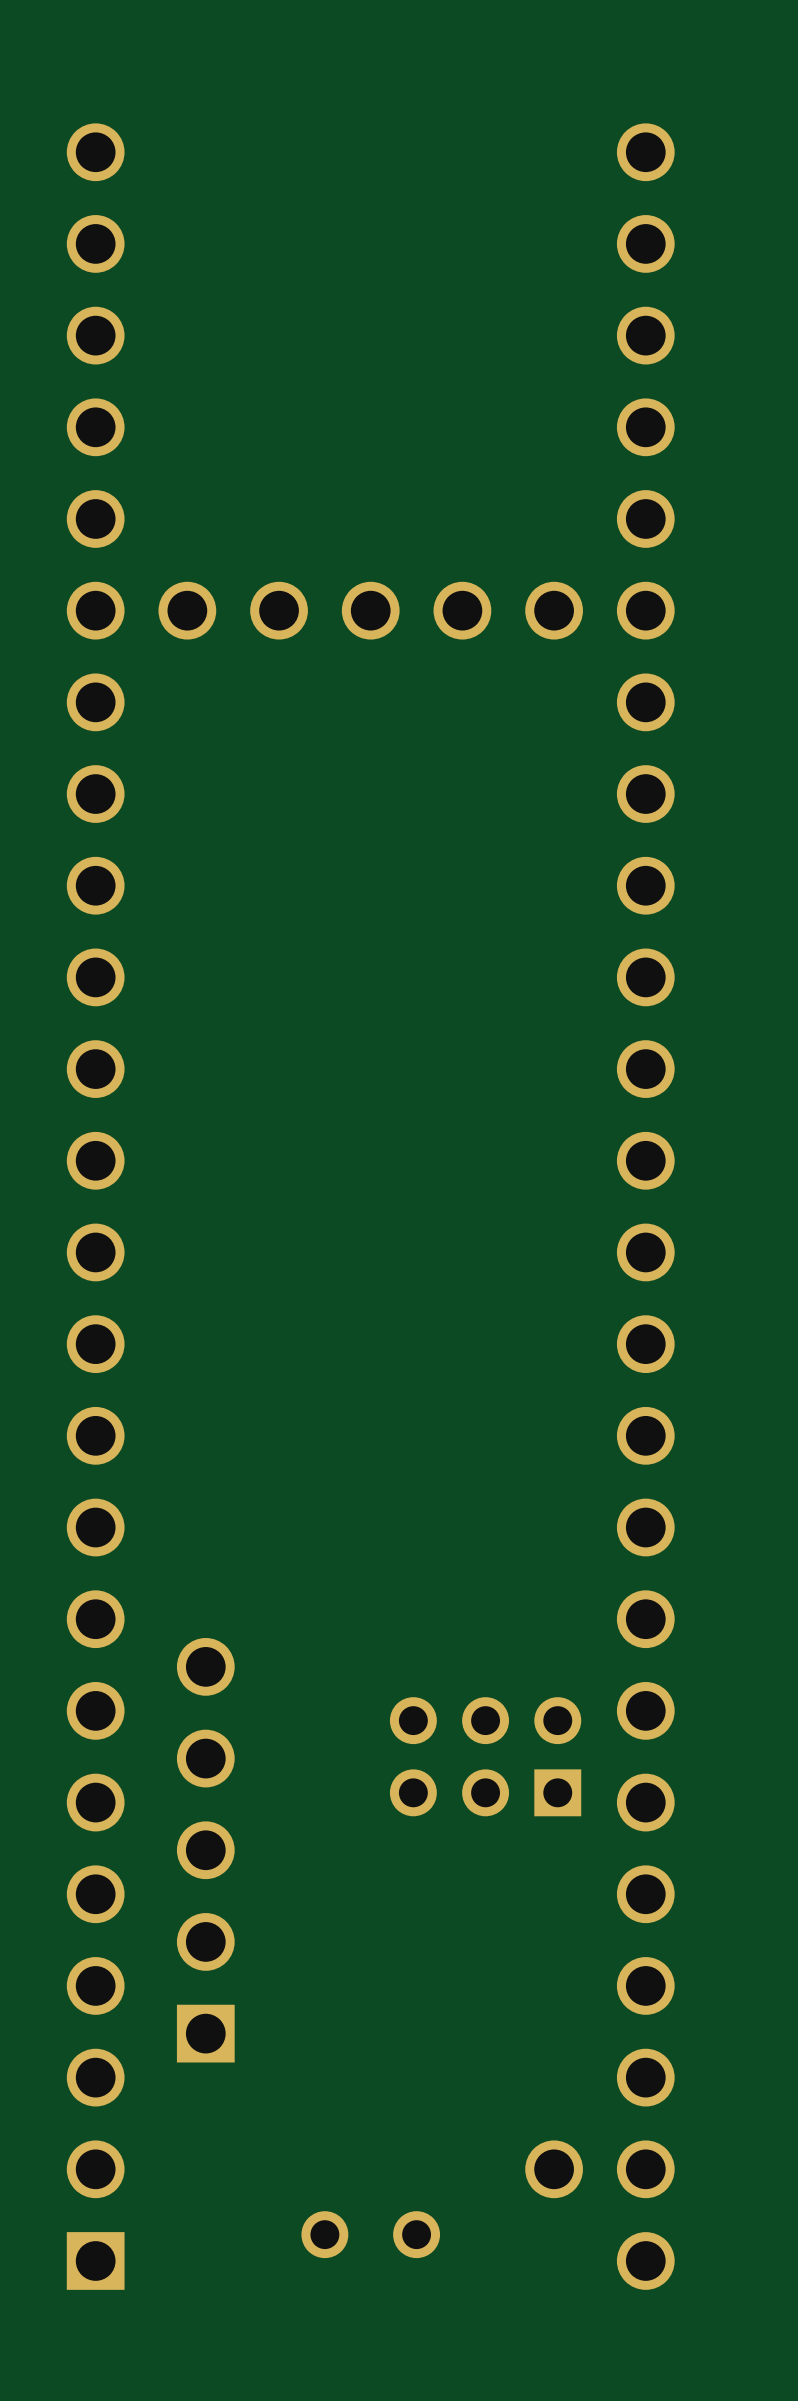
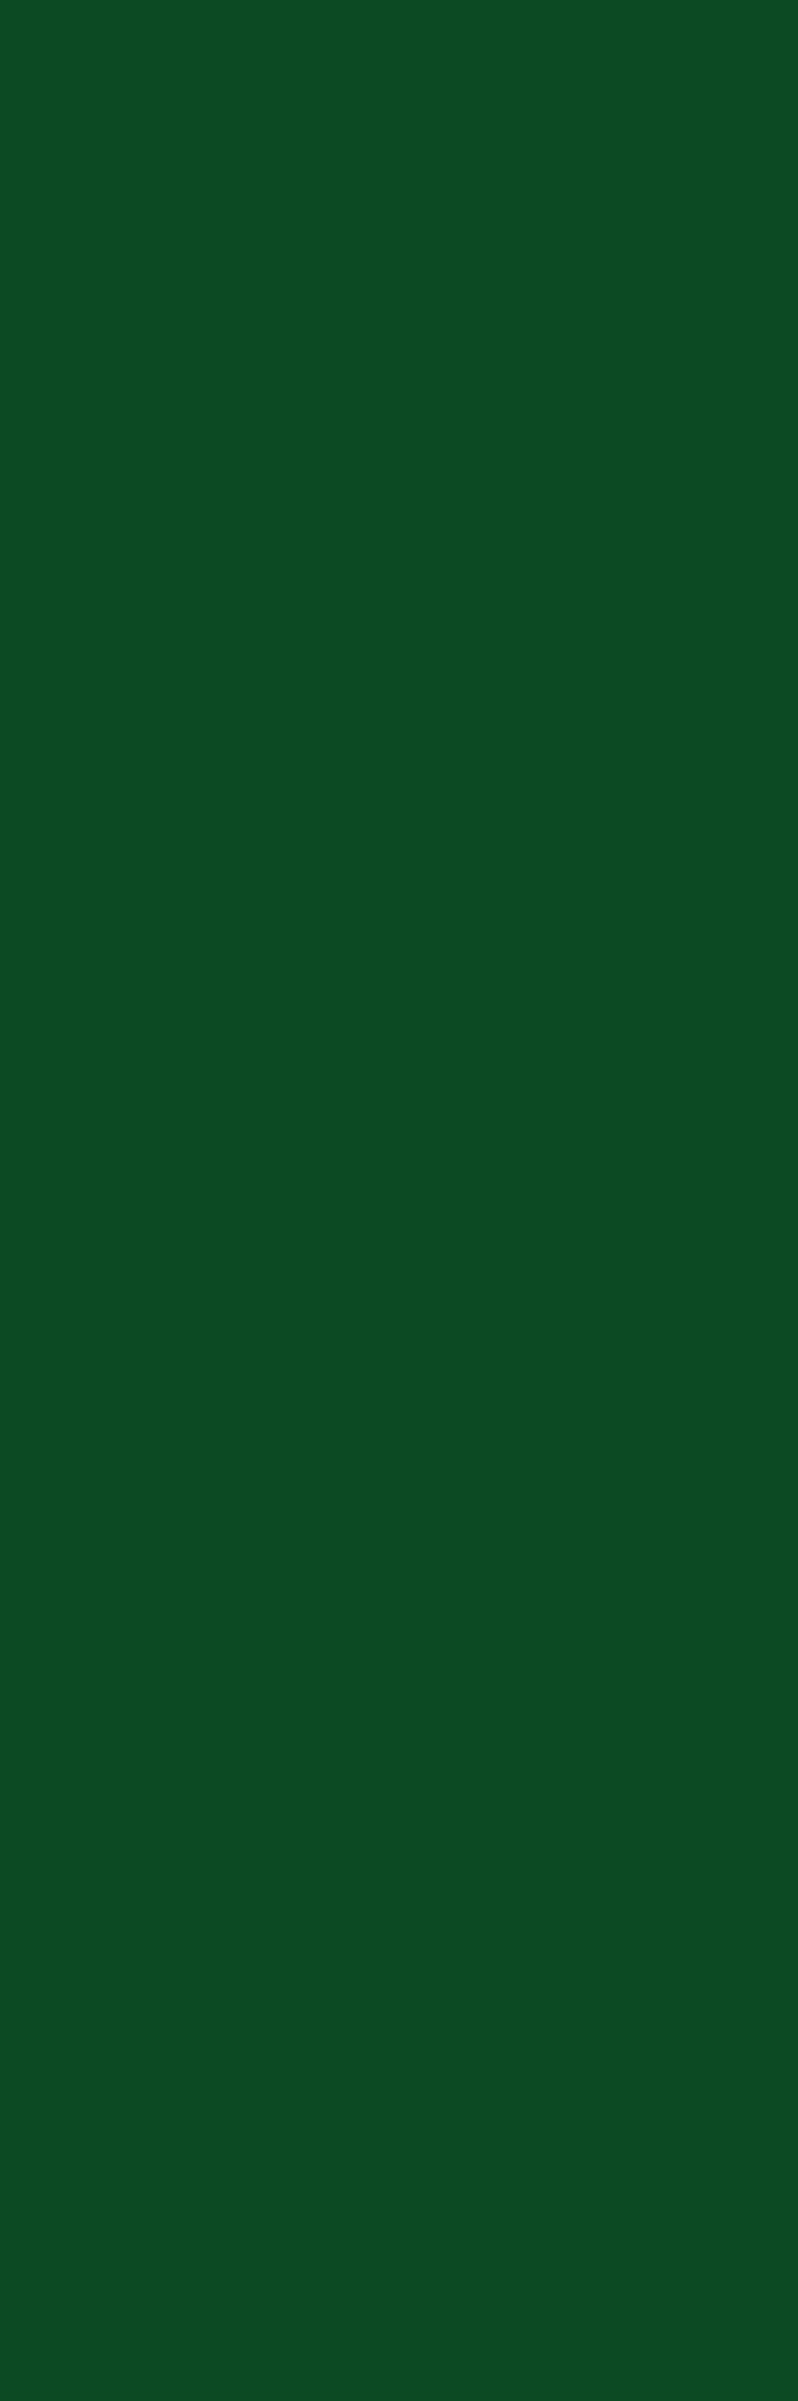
part: (370, 1206) -> none

